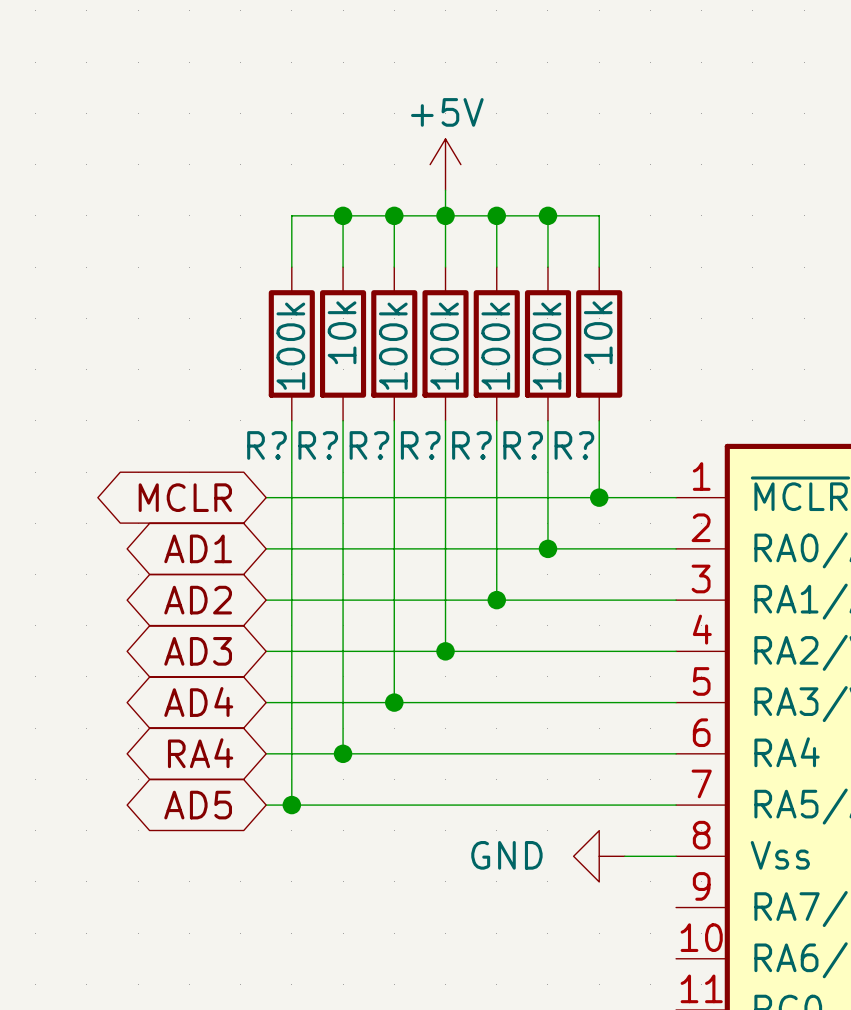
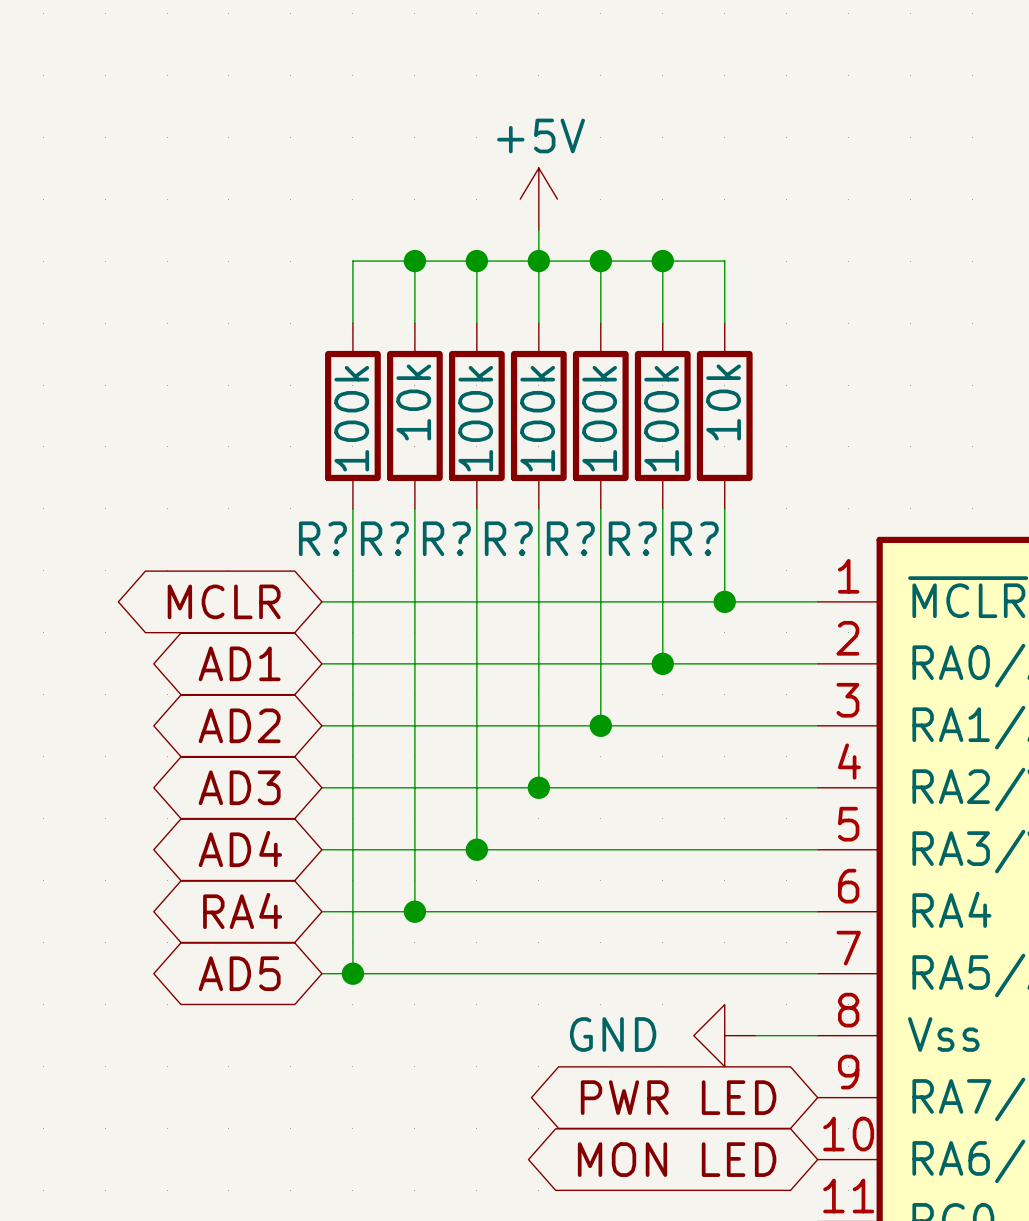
global label: none -> PWR LED (678, 1097)
global label: none -> MON LED (677, 1159)

